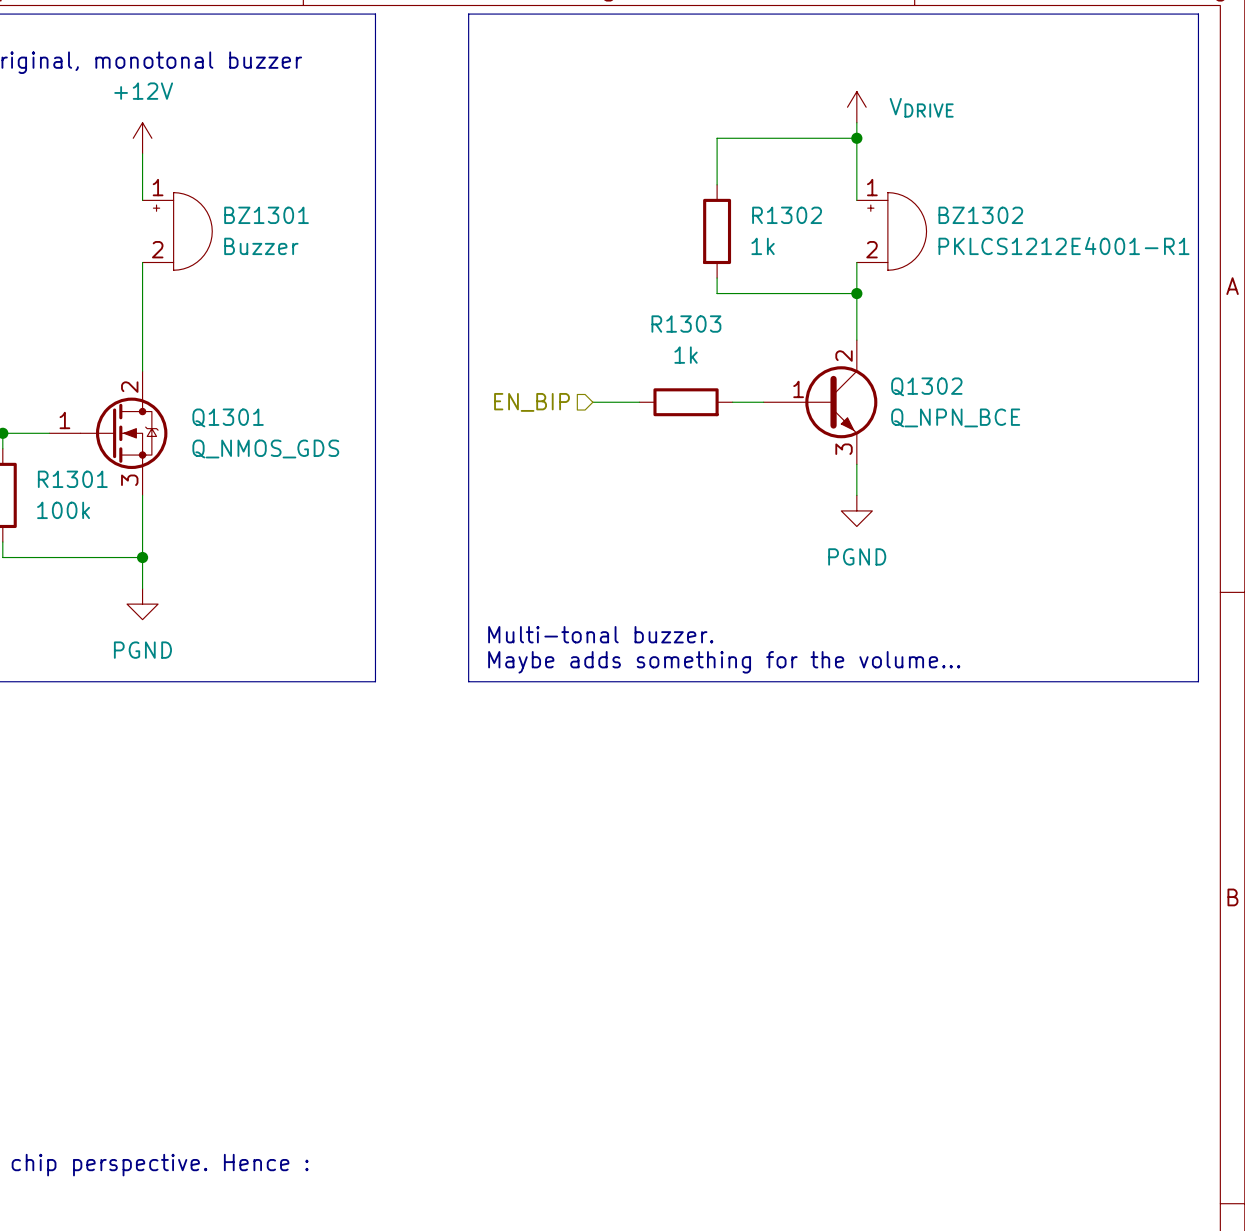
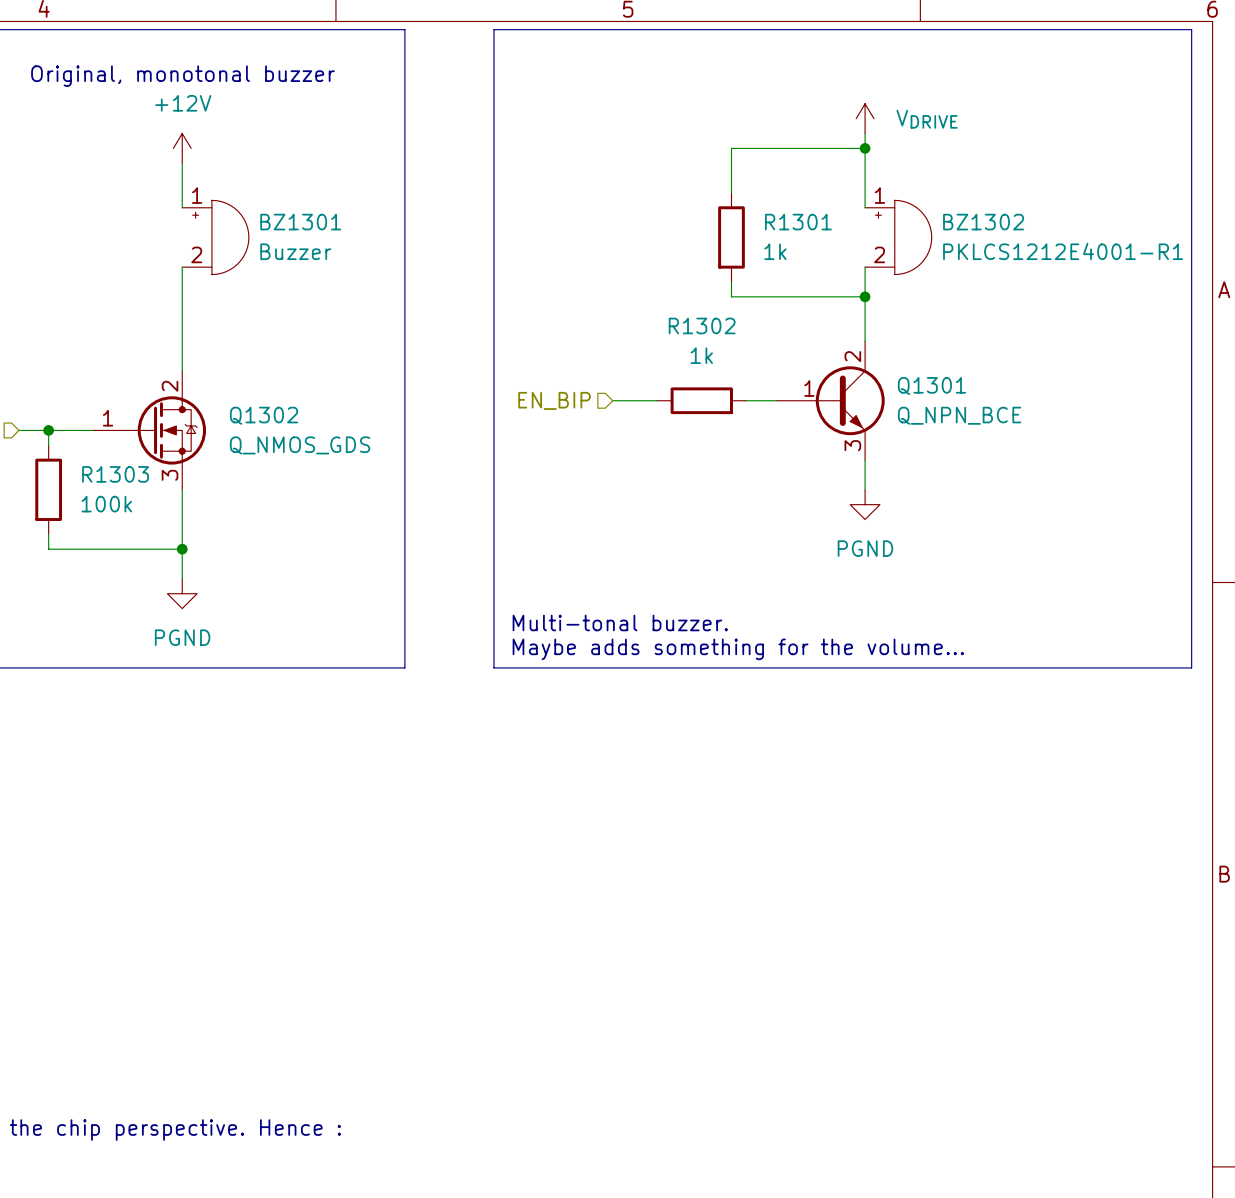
R1302 name: R1302 (787, 215) -> R1301 (798, 222)
R1303 name: R1303 (686, 324) -> R1302 (702, 325)
Q1302 name: Q1302 (926, 386) -> Q1301 (931, 386)
Q1301 name: Q1301 (228, 417) -> Q1302 (264, 415)
R1301 name: R1301 (72, 479) -> R1303 (115, 474)

